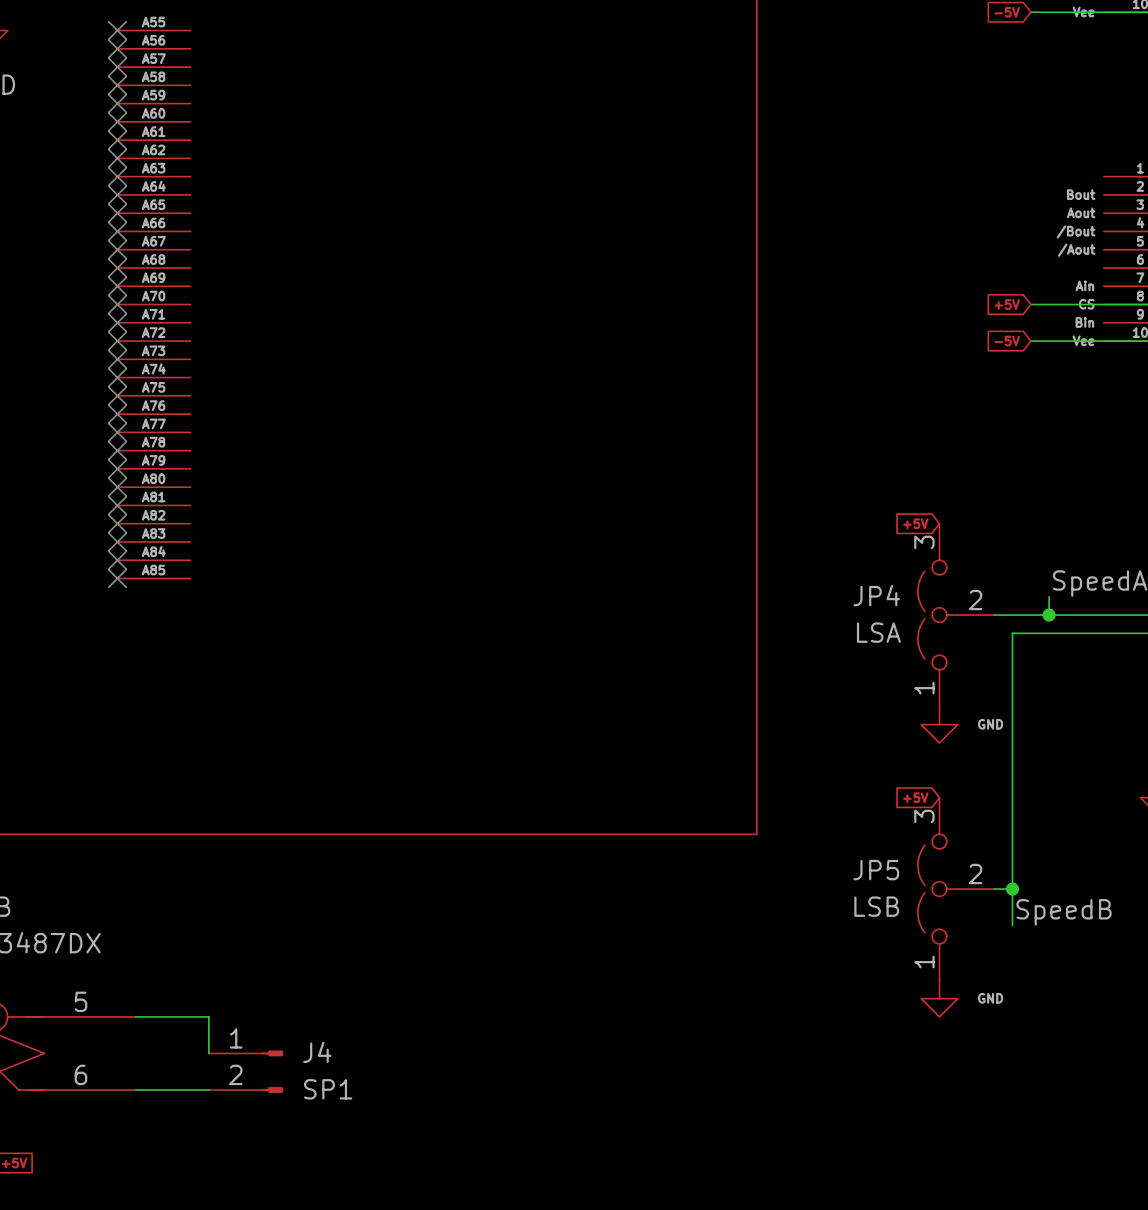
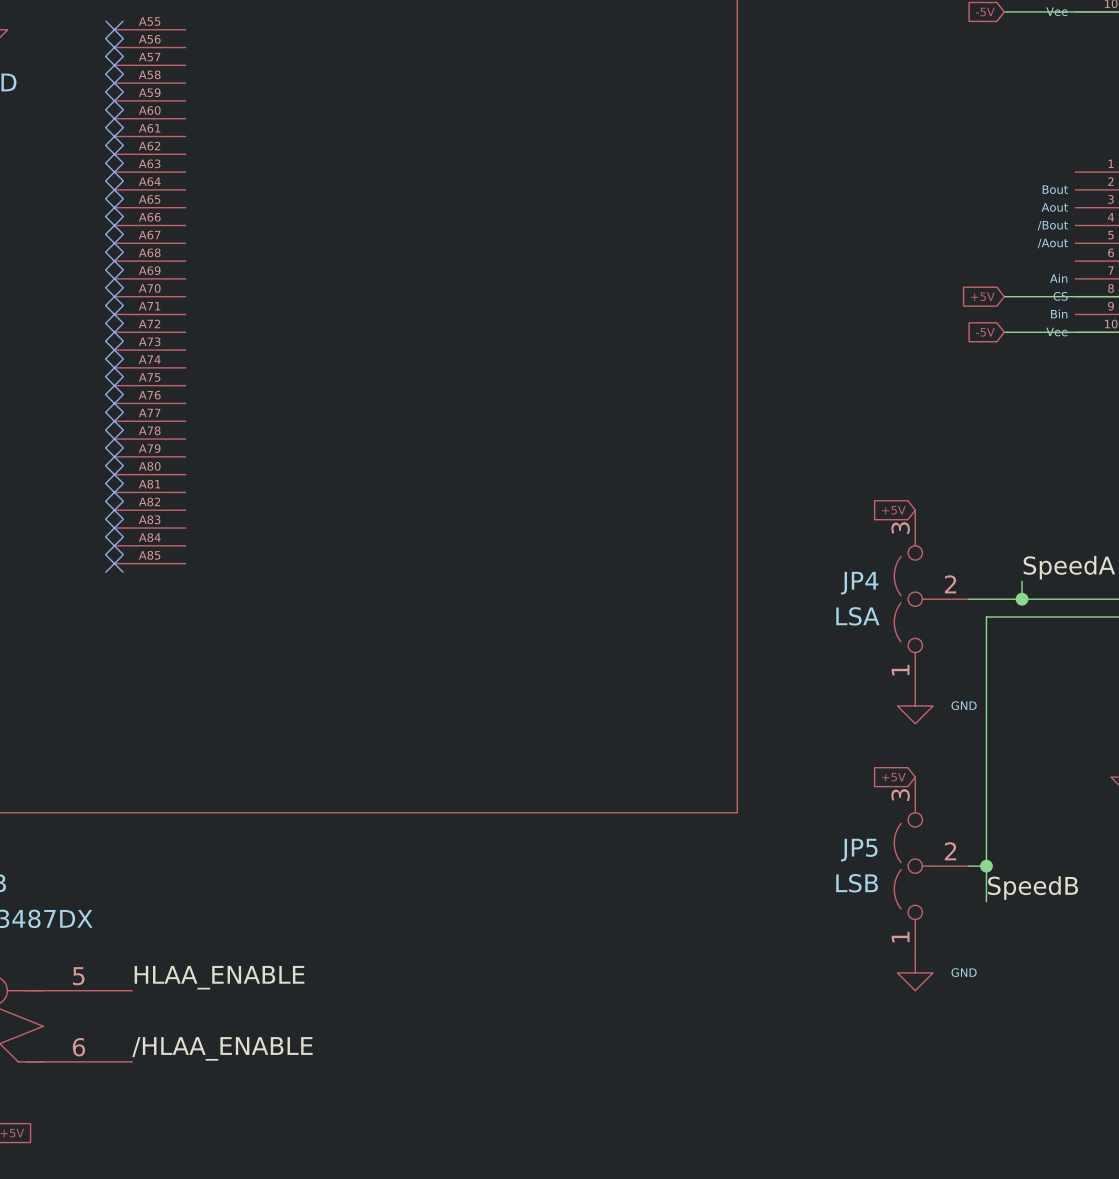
label: none -> HLAA_ENABLE (219, 977)
wire: (135, 1016) (208, 1016) (208, 1053) -> none
J4: SP1 (245, 1071) -> none
label: none -> /HLAA_ENABLE (222, 1048)
wire: (135, 1089) (208, 1089) -> none

